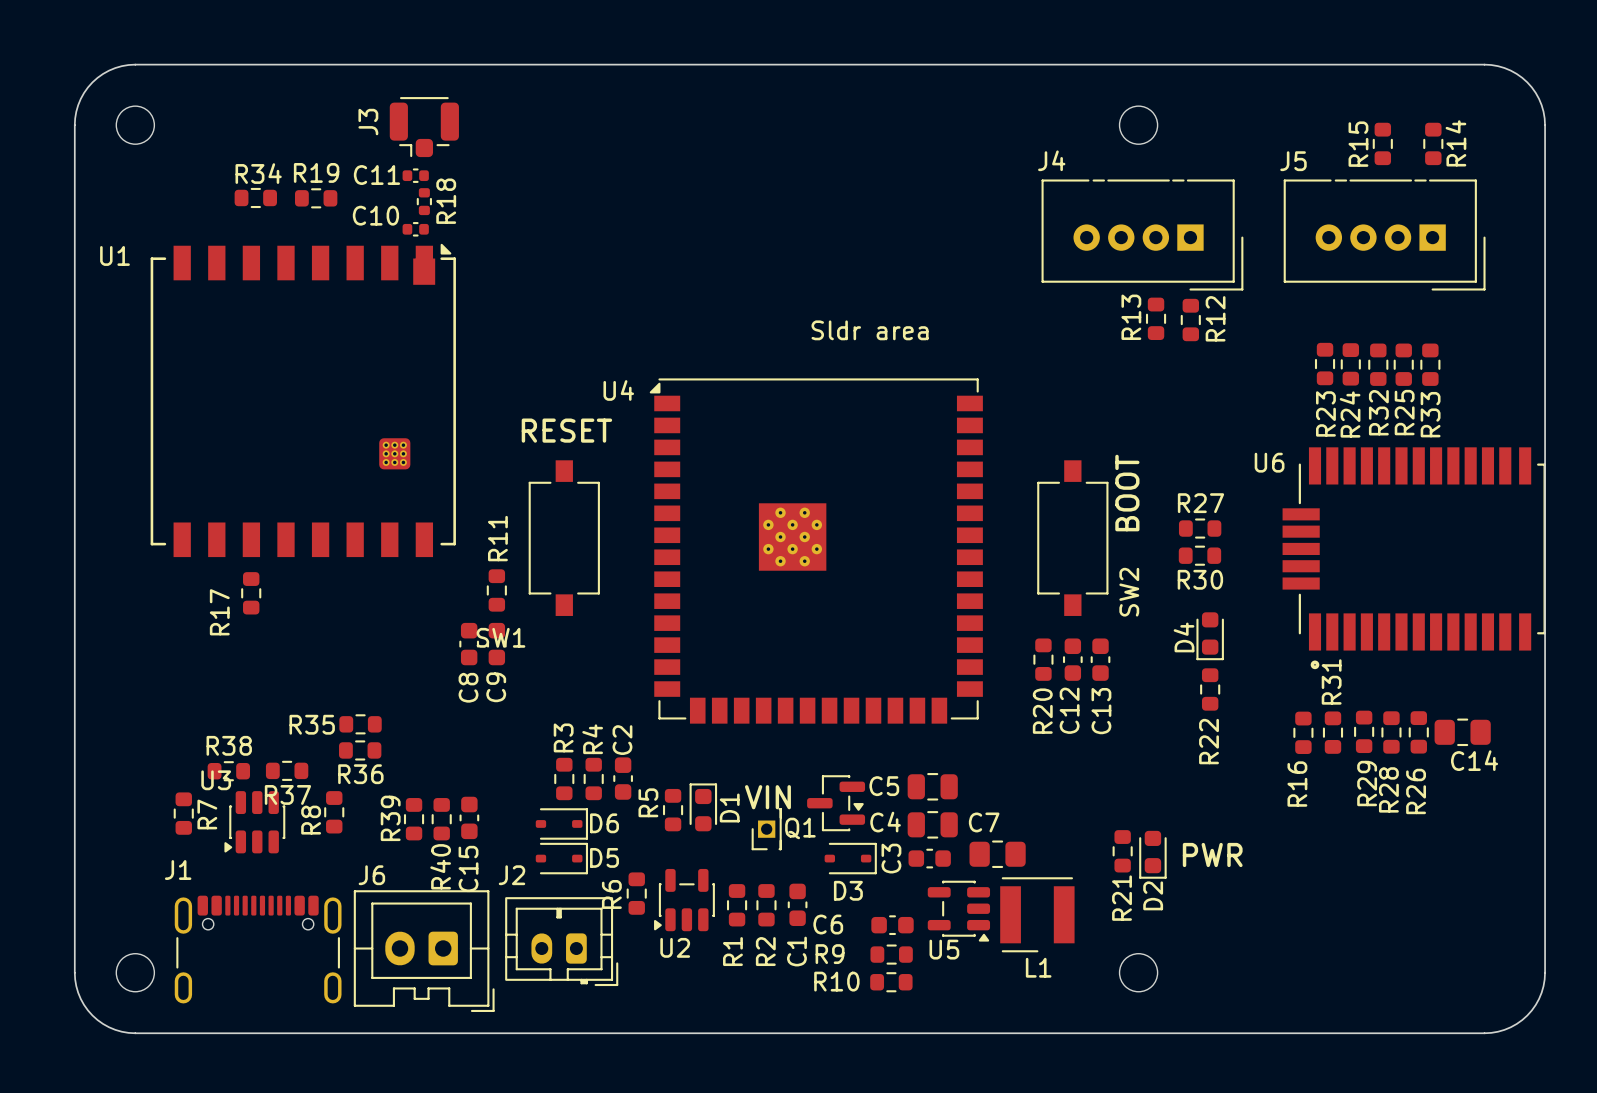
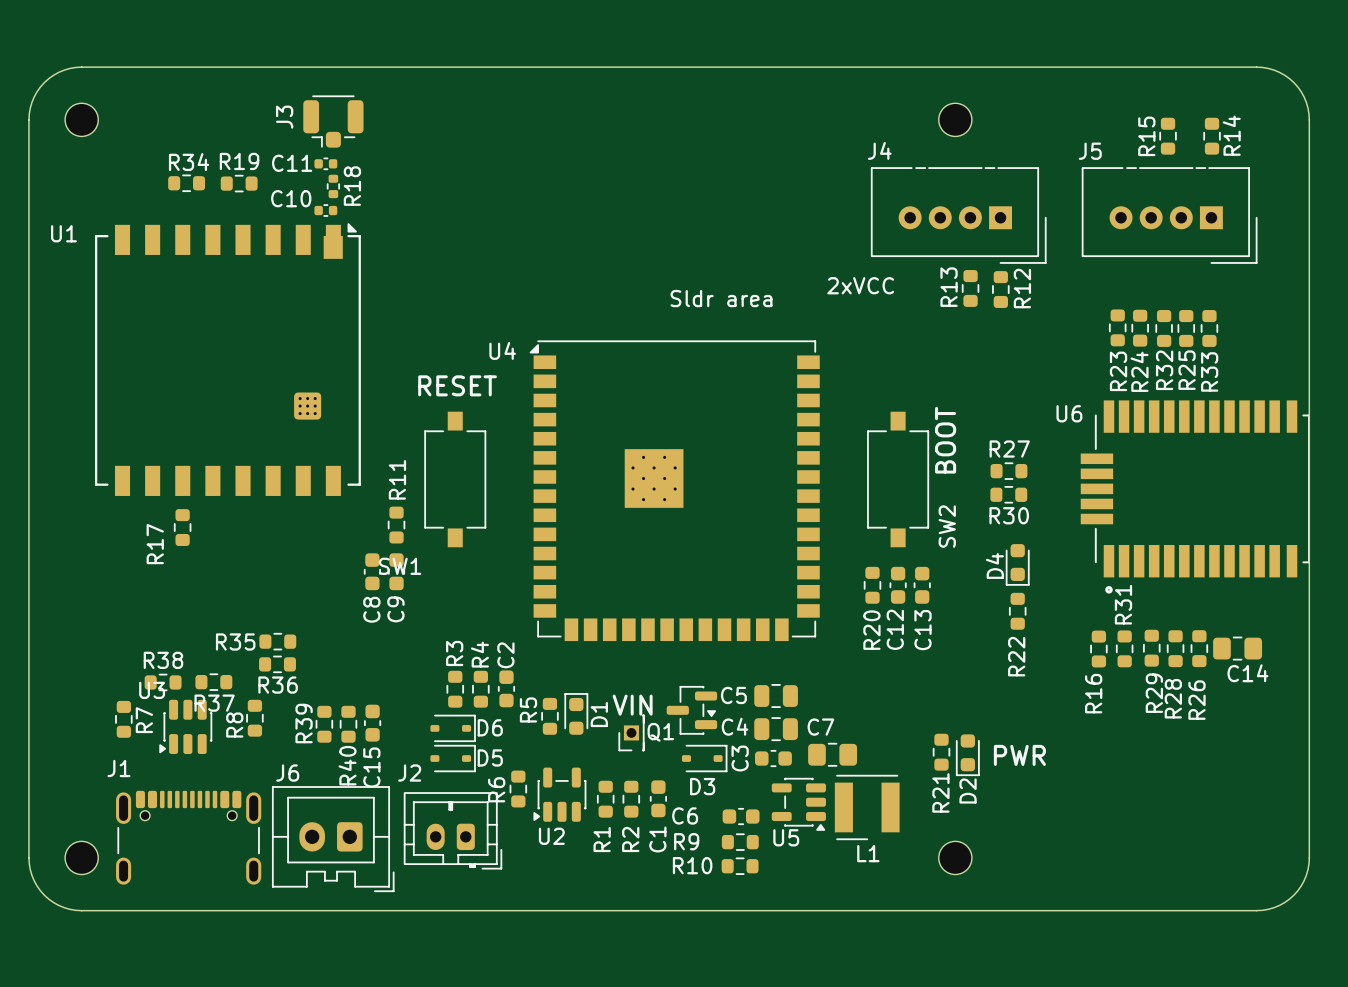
text: none -> 2xVCC (860, 285)

